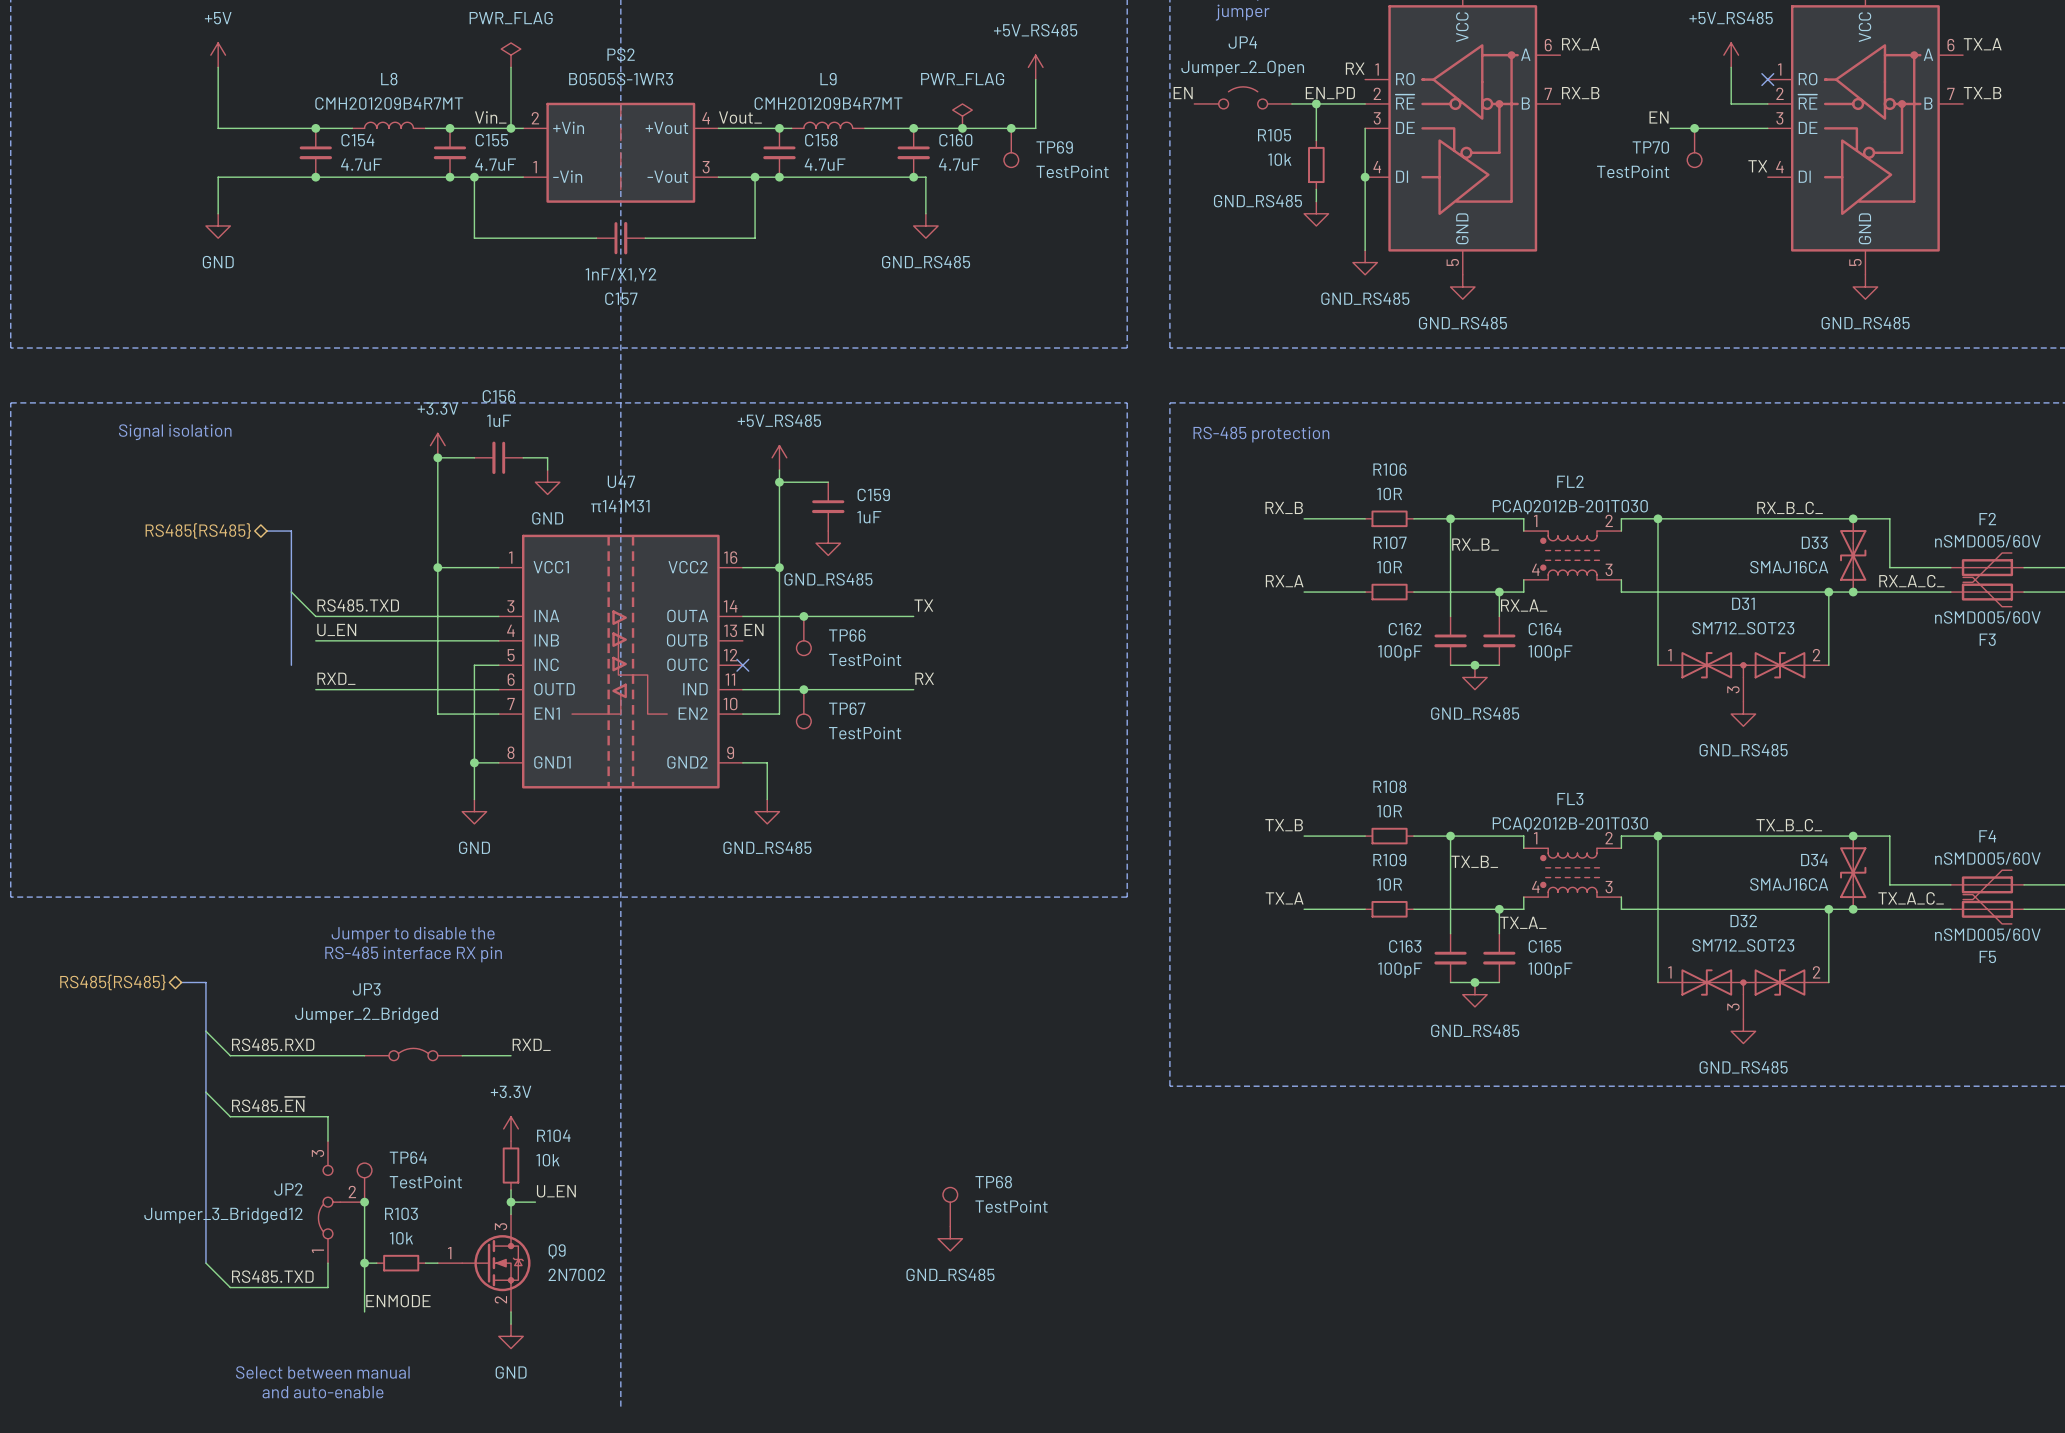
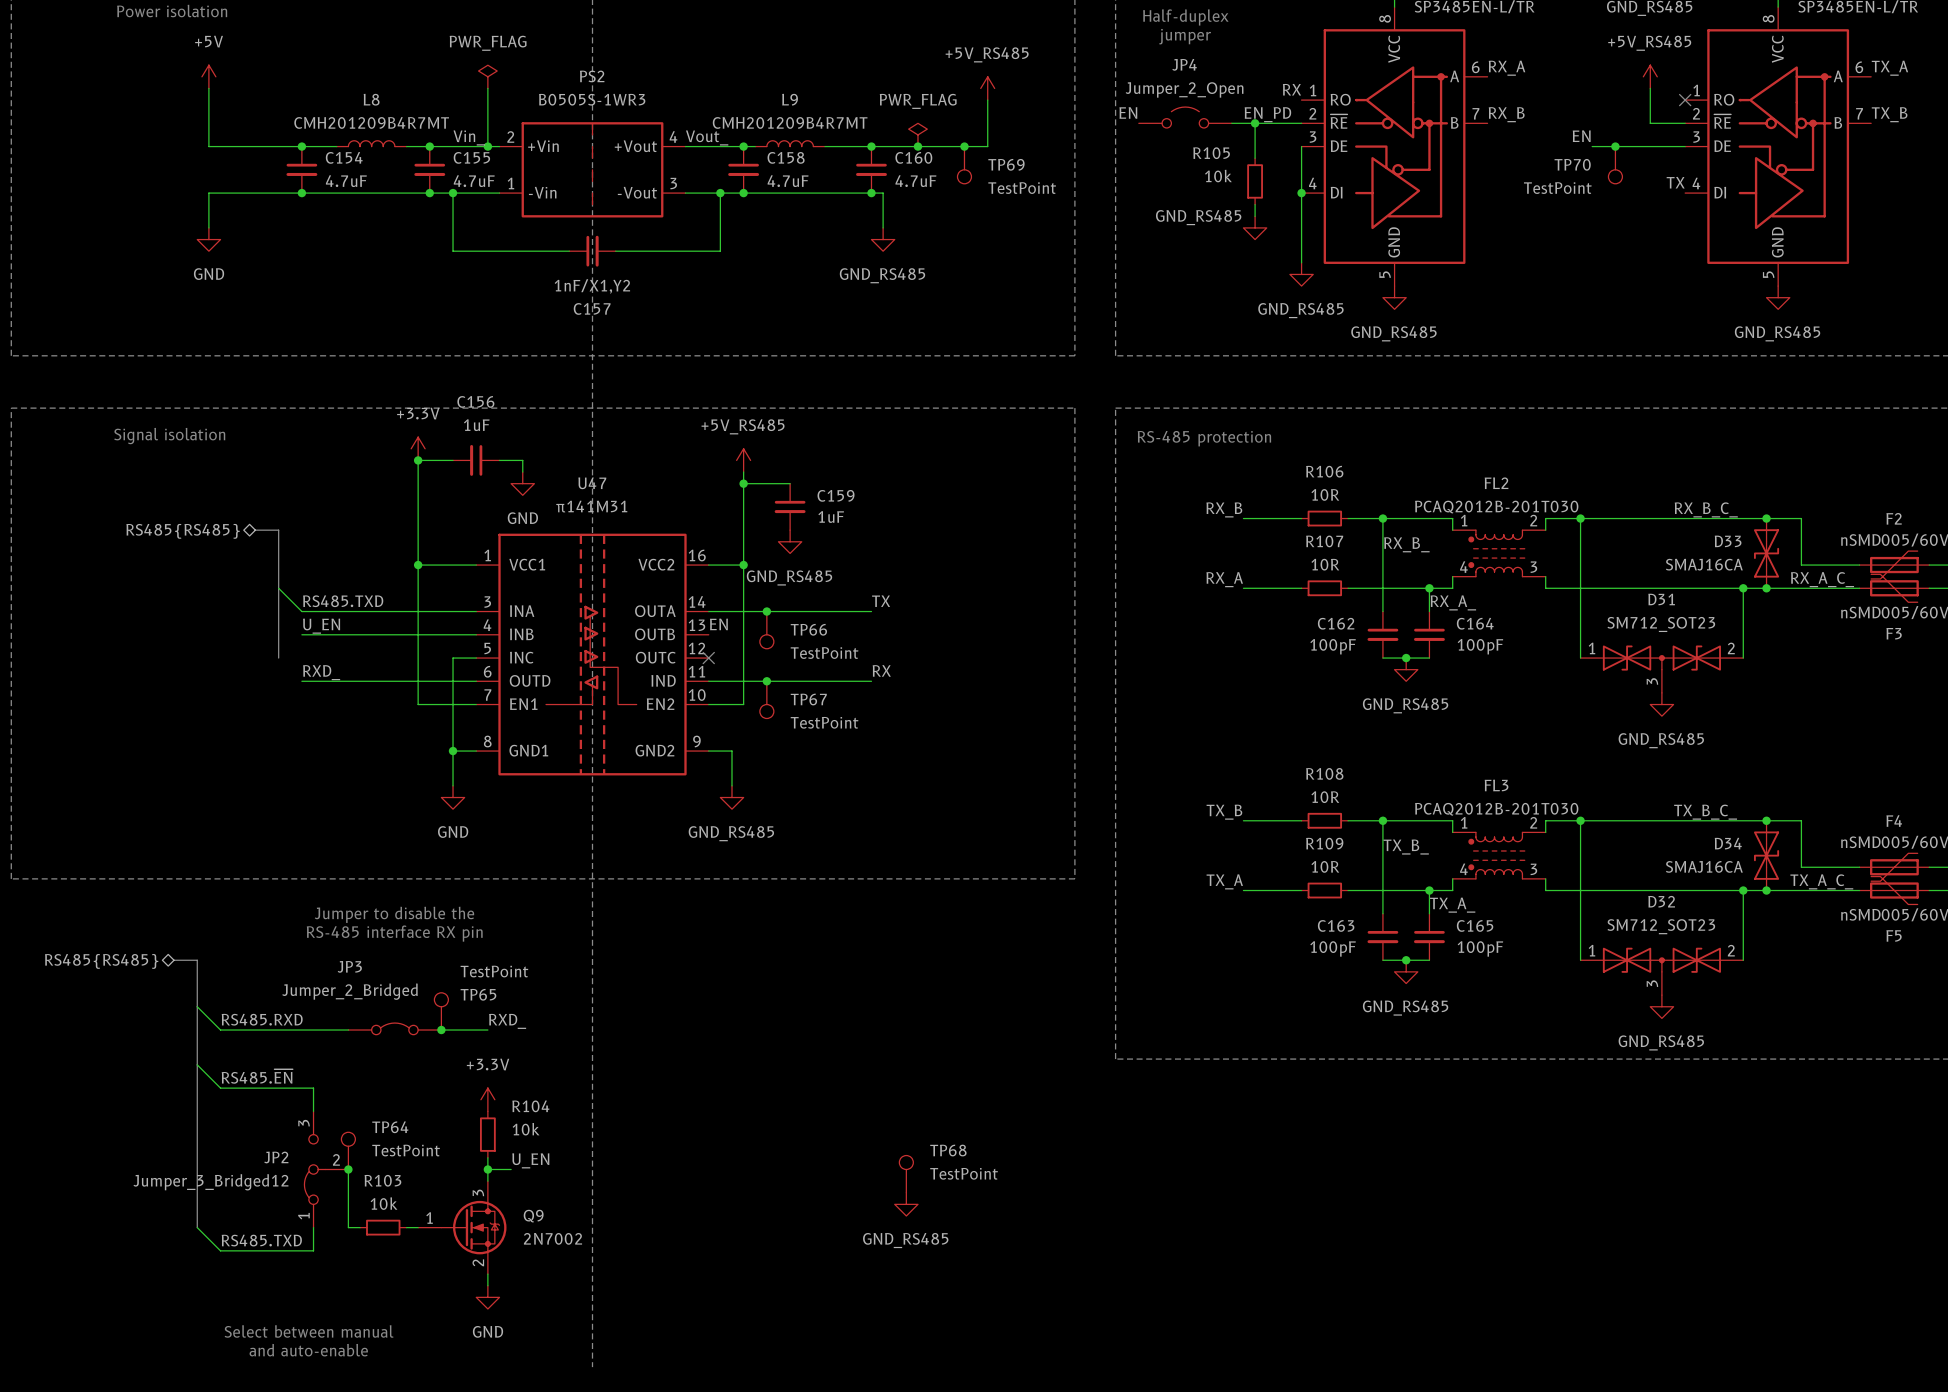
TP65: none -> TestPoint (441, 1011)
junction: none -> (441, 1030)
wire: (364, 1263) (364, 1311) -> none
junction: (364, 1263) -> none
label: ENMODE (398, 1301) -> none

